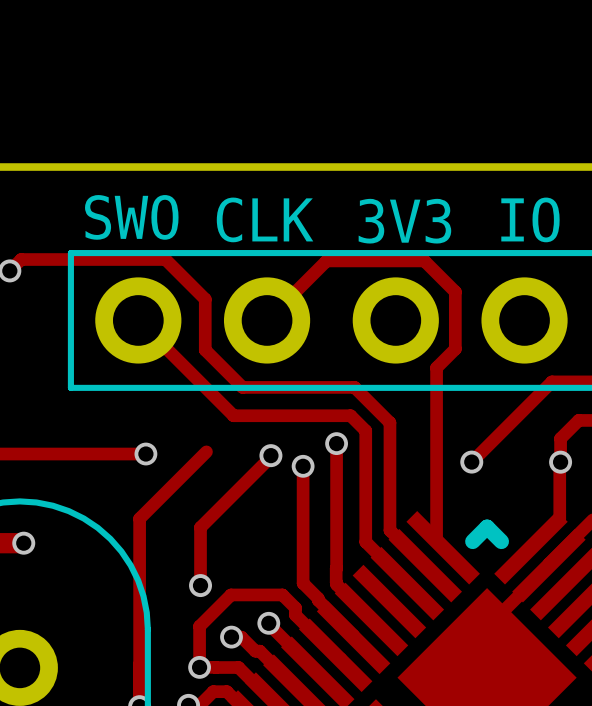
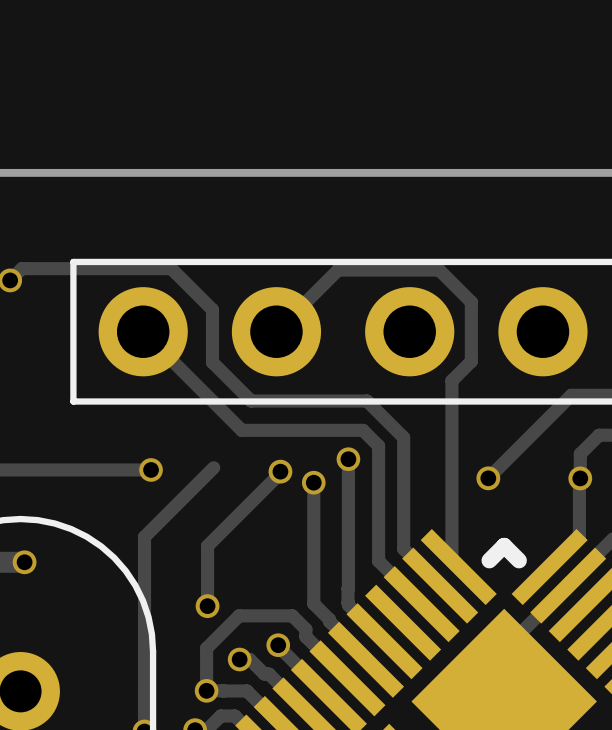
text: SWO (131, 217) -> none
text: CLK (265, 219) -> none
text: IO (530, 219) -> none
text: 3V3 (404, 221) -> none

